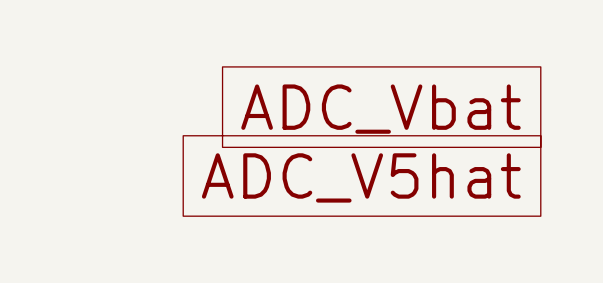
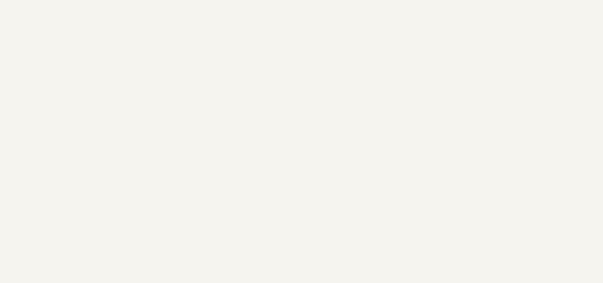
global label: ADC_Vbat (380, 109) -> none
global label: ADC_V5hat (361, 177) -> none

